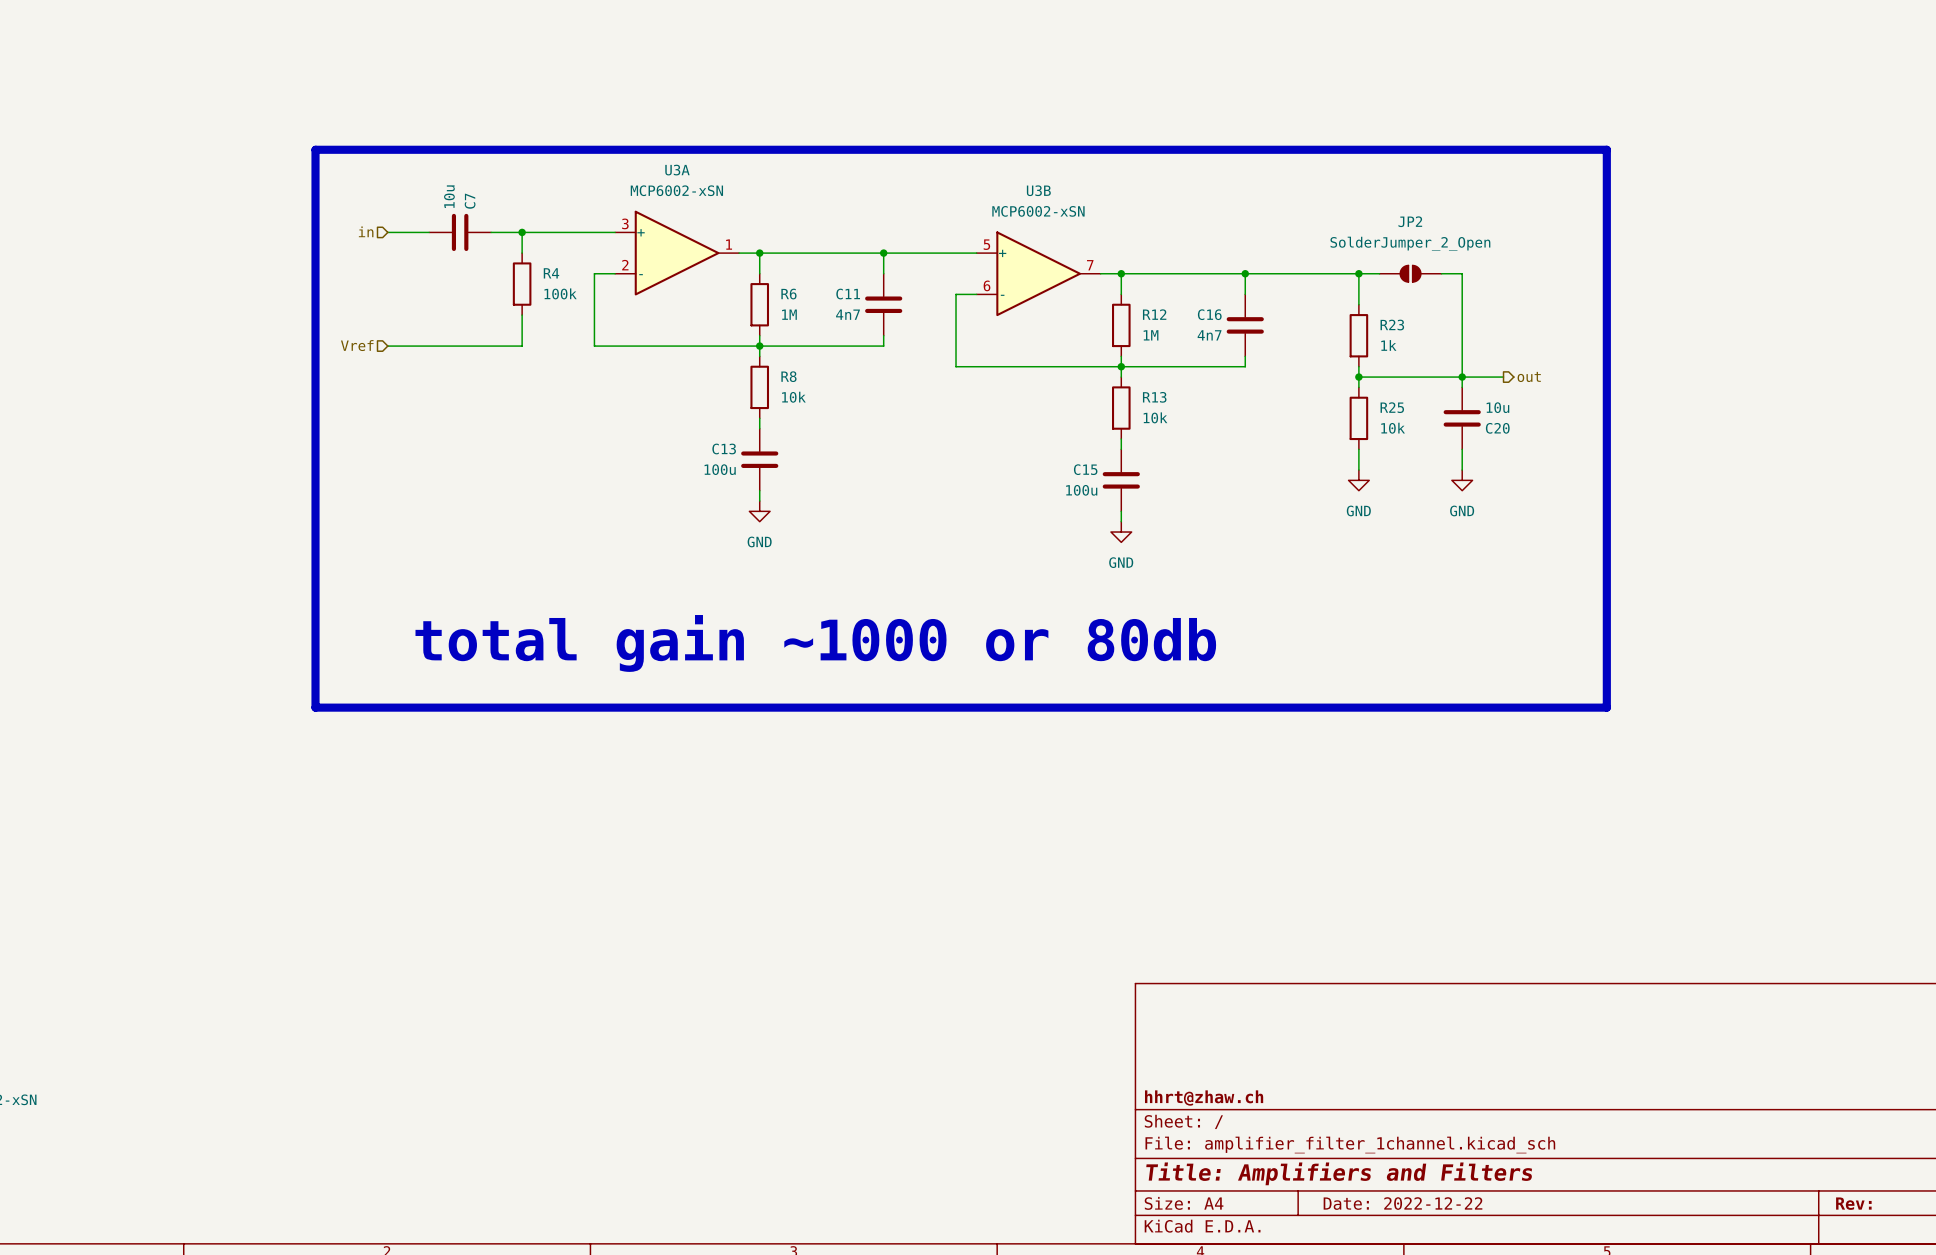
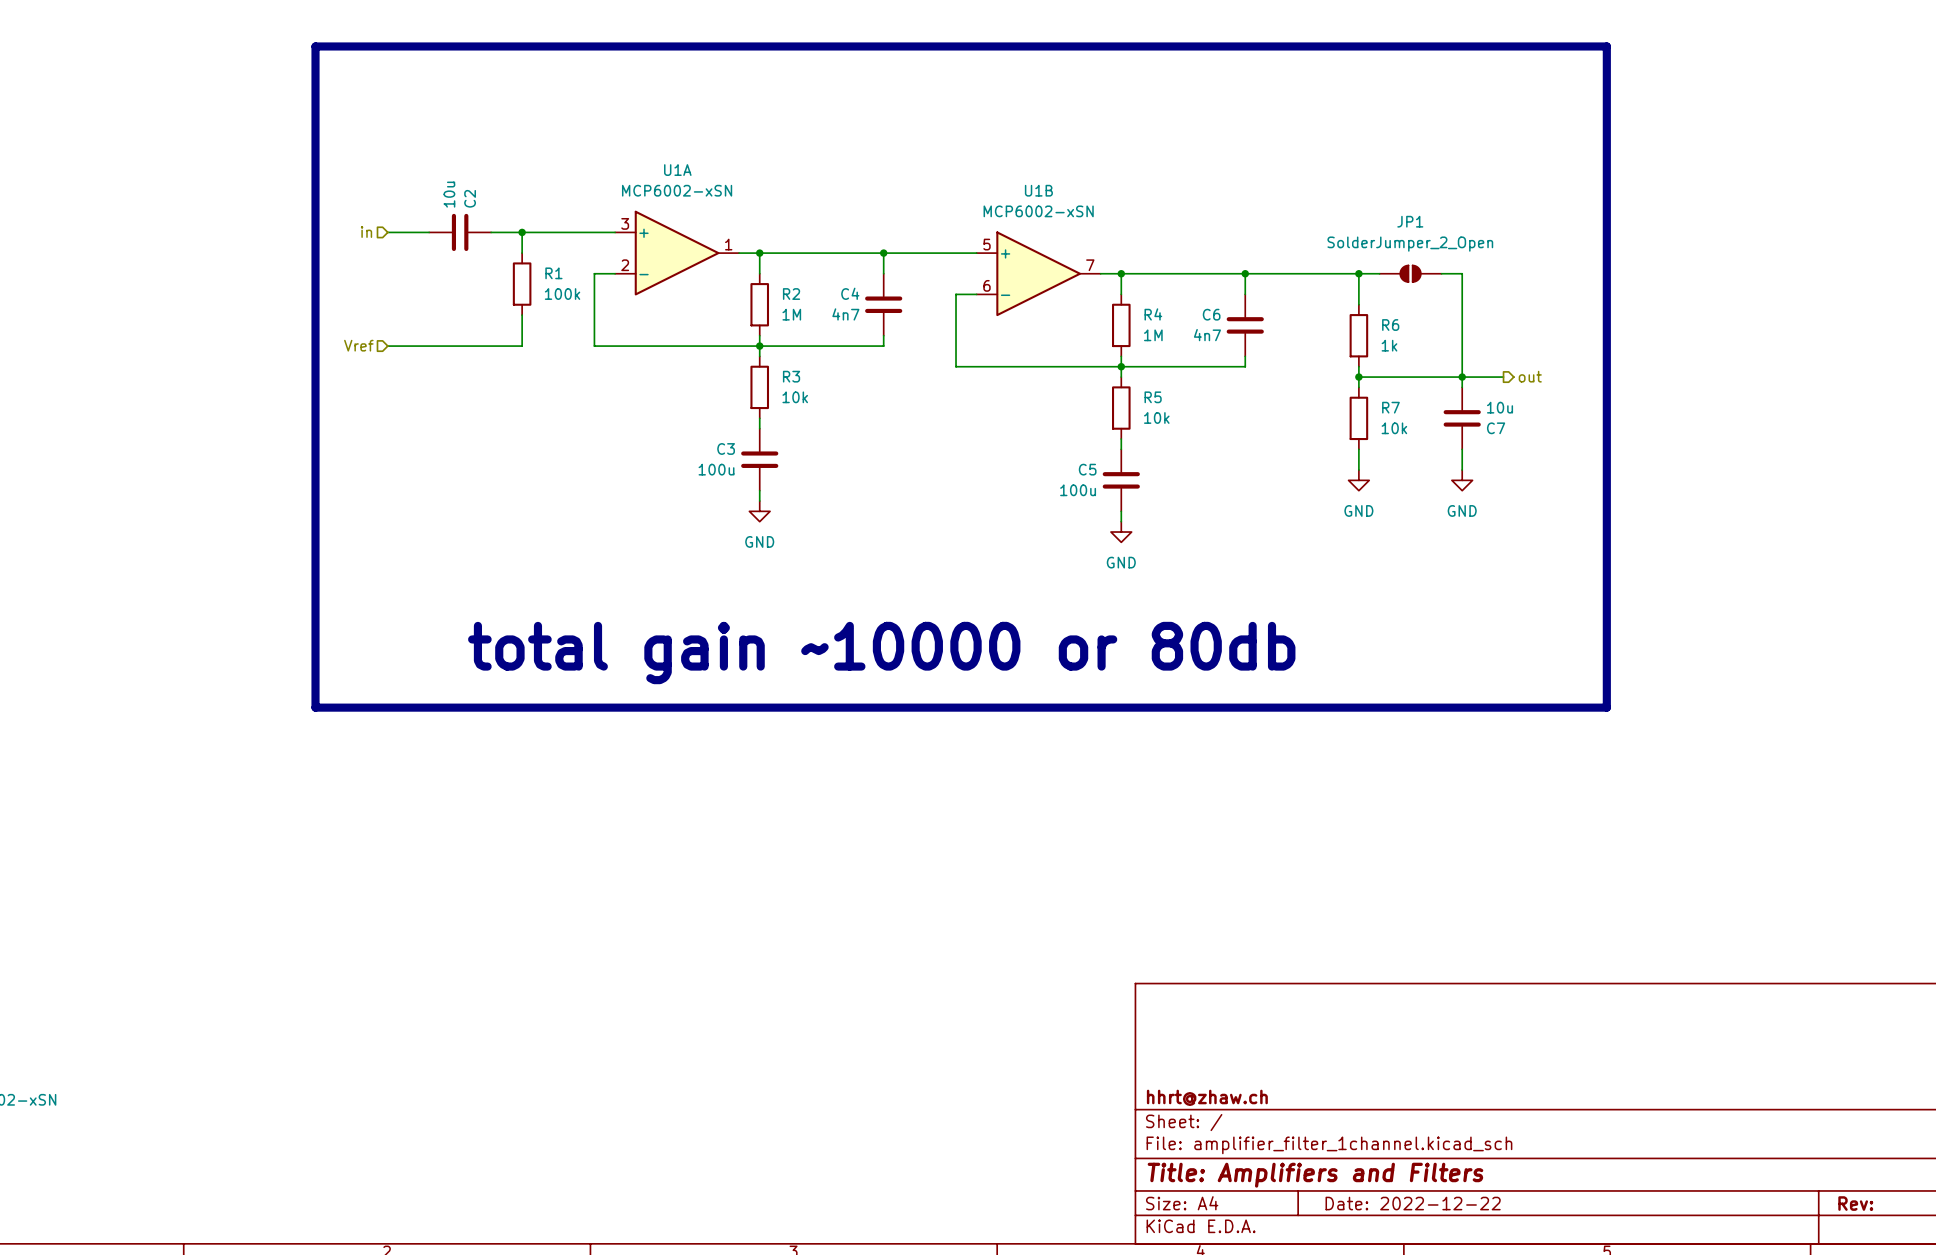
line: (315, 149) (1606, 149) -> (315, 149) (315, 46) (1606, 46) (1606, 149)
U3A name: U3A (677, 170) -> U1A (677, 170)
U3B name: U3B (1038, 190) -> U1B (1038, 190)
C7 name: C7 (470, 201) -> C2 (470, 198)
JP2 name: JP2 (1410, 221) -> JP1 (1410, 221)
R4 name: R4 (551, 273) -> R1 (553, 273)
R6 name: R6 (788, 294) -> R2 (791, 294)
C11 name: C11 (848, 294) -> C4 (850, 293)
R12 name: R12 (1154, 314) -> R4 (1153, 314)
C16 name: C16 (1209, 314) -> C6 (1211, 314)
R23 name: R23 (1392, 325) -> R6 (1390, 325)
R8 name: R8 (788, 376) -> R3 (791, 376)
R13 name: R13 (1154, 397) -> R5 (1153, 397)
R25 name: R25 (1392, 407) -> R7 (1390, 407)
C20 name: C20 (1497, 428) -> C7 (1496, 428)
C13 name: C13 (724, 448) -> C3 (726, 448)
C15 name: C15 (1085, 469) -> C5 (1087, 469)
text: total gain ~1000 or 80db (815, 643) -> total gain ~10000 or 80db (881, 653)

